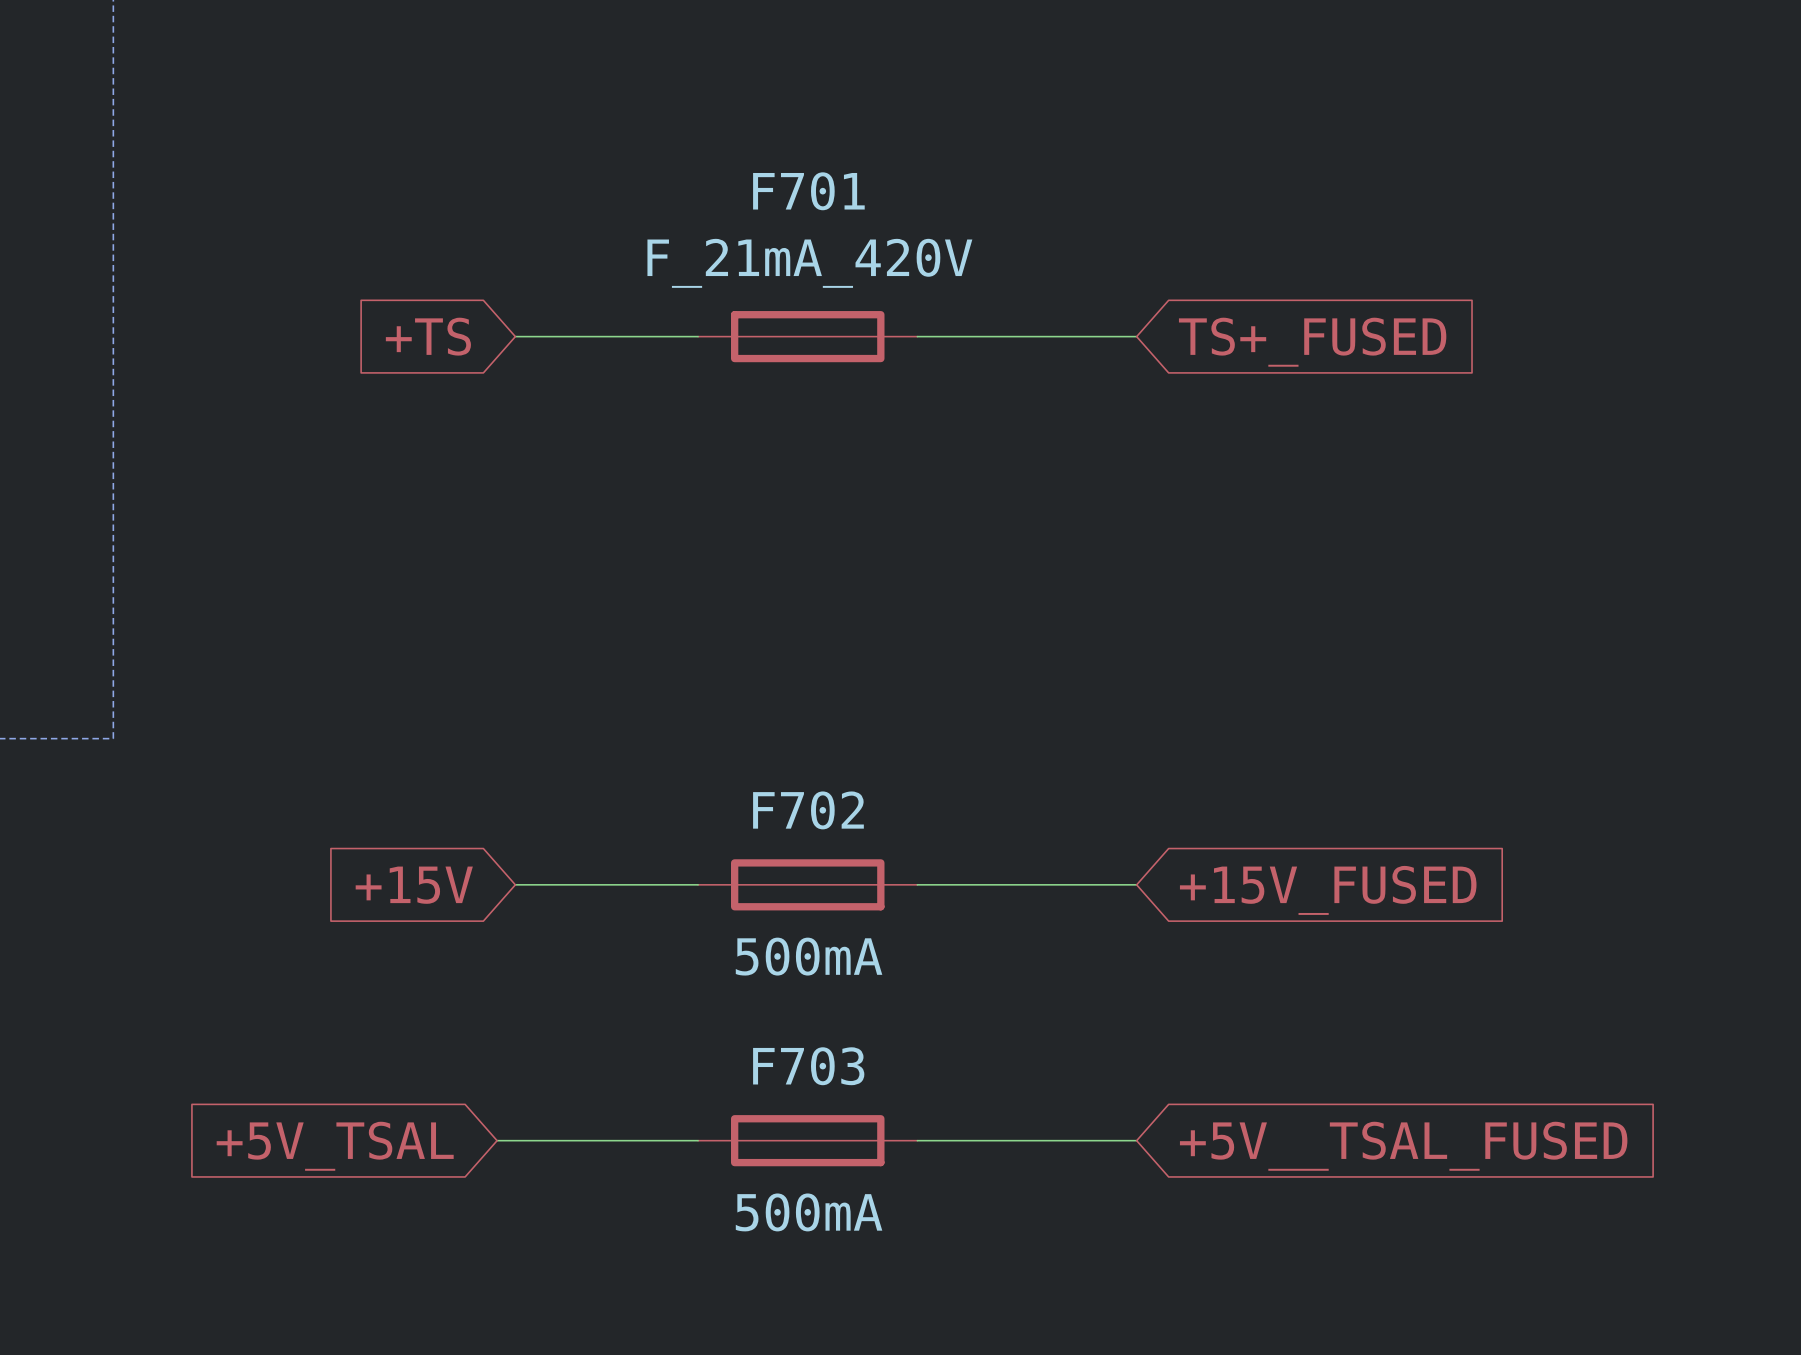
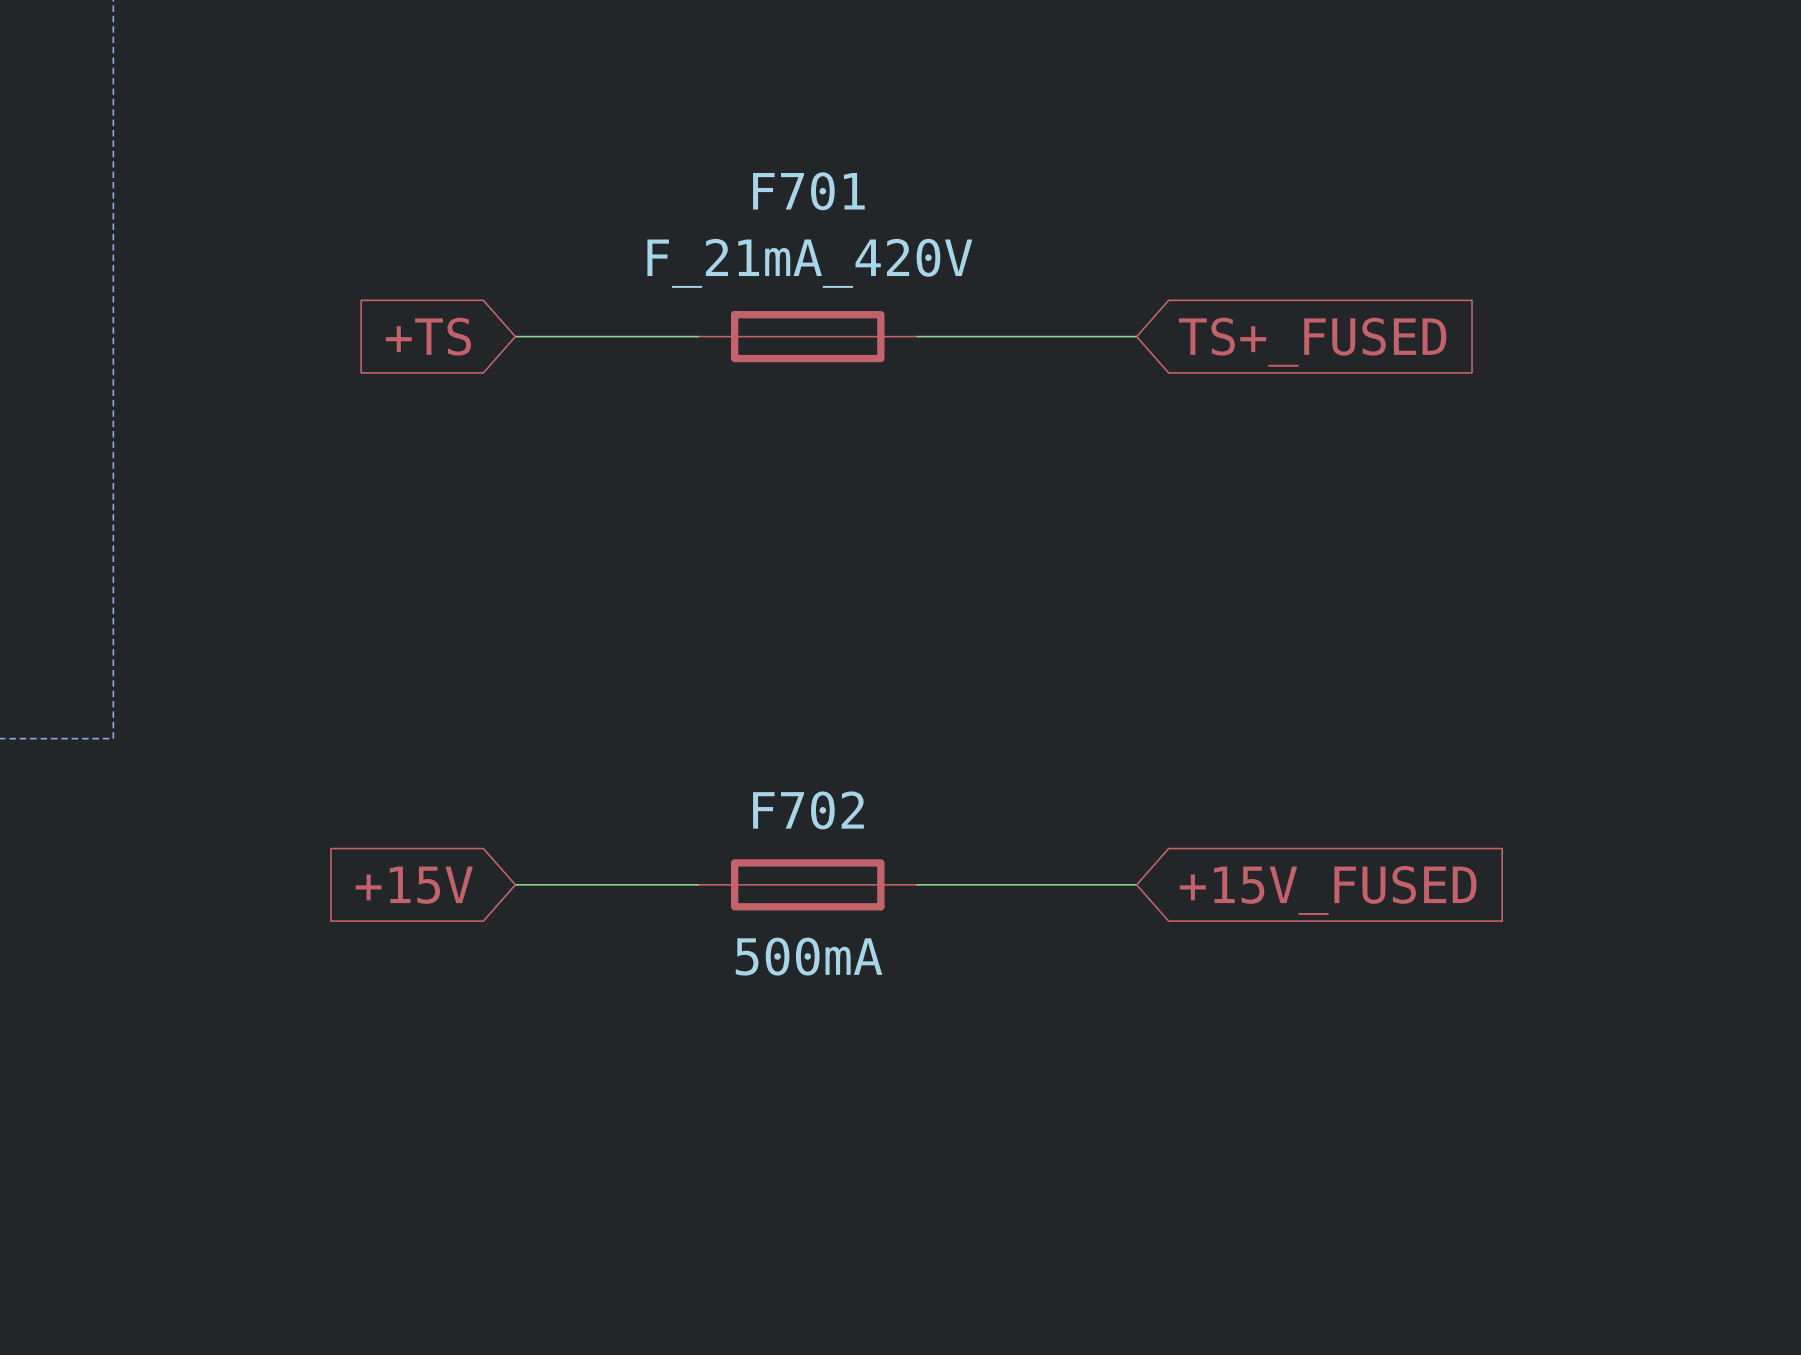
wire: (497, 1140) (698, 1140) -> none
F703: 500mA (807, 1140) -> none
wire: (917, 1140) (1136, 1140) -> none
global label: +5V_TSAL (335, 1146) -> none
global label: +5V__TSAL_FUSED (1403, 1146) -> none

